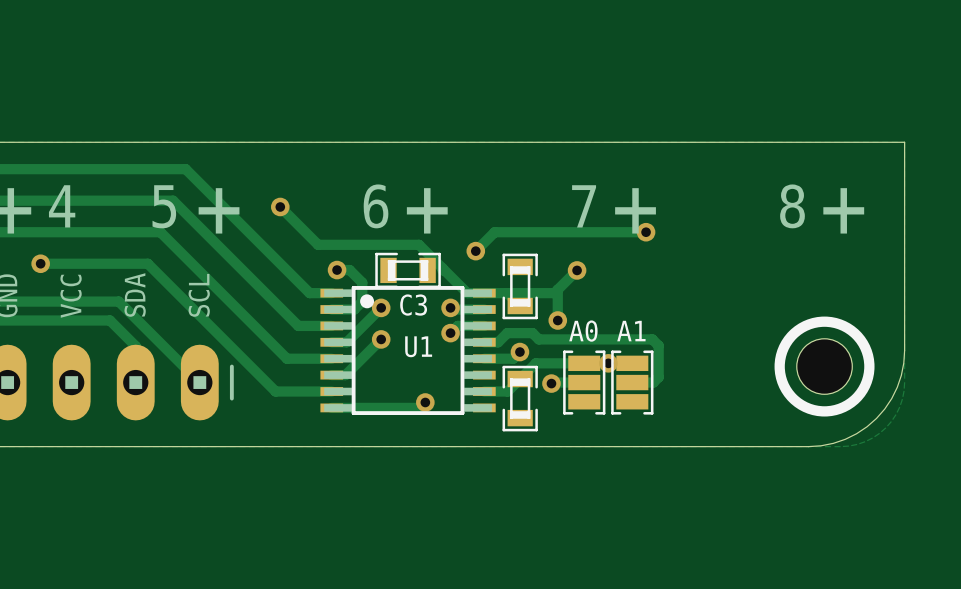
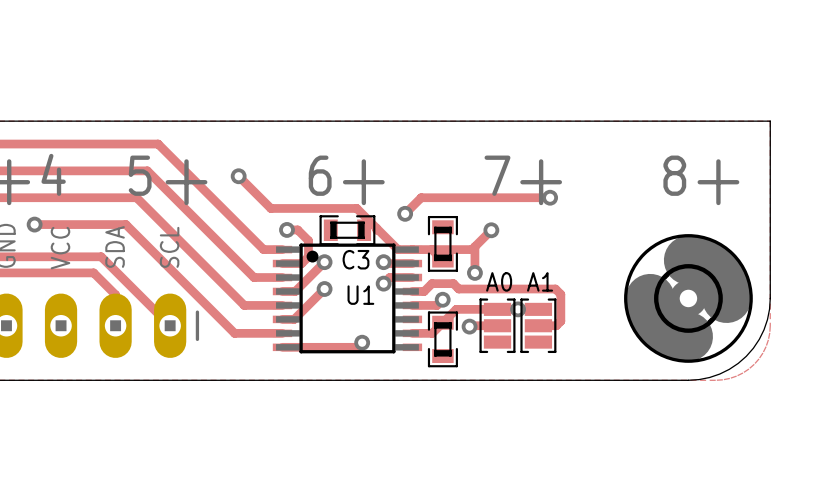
drawing: [774, 316, 875, 417] -> none
part: none -> (688, 298)
hole: (824, 366) -> none

